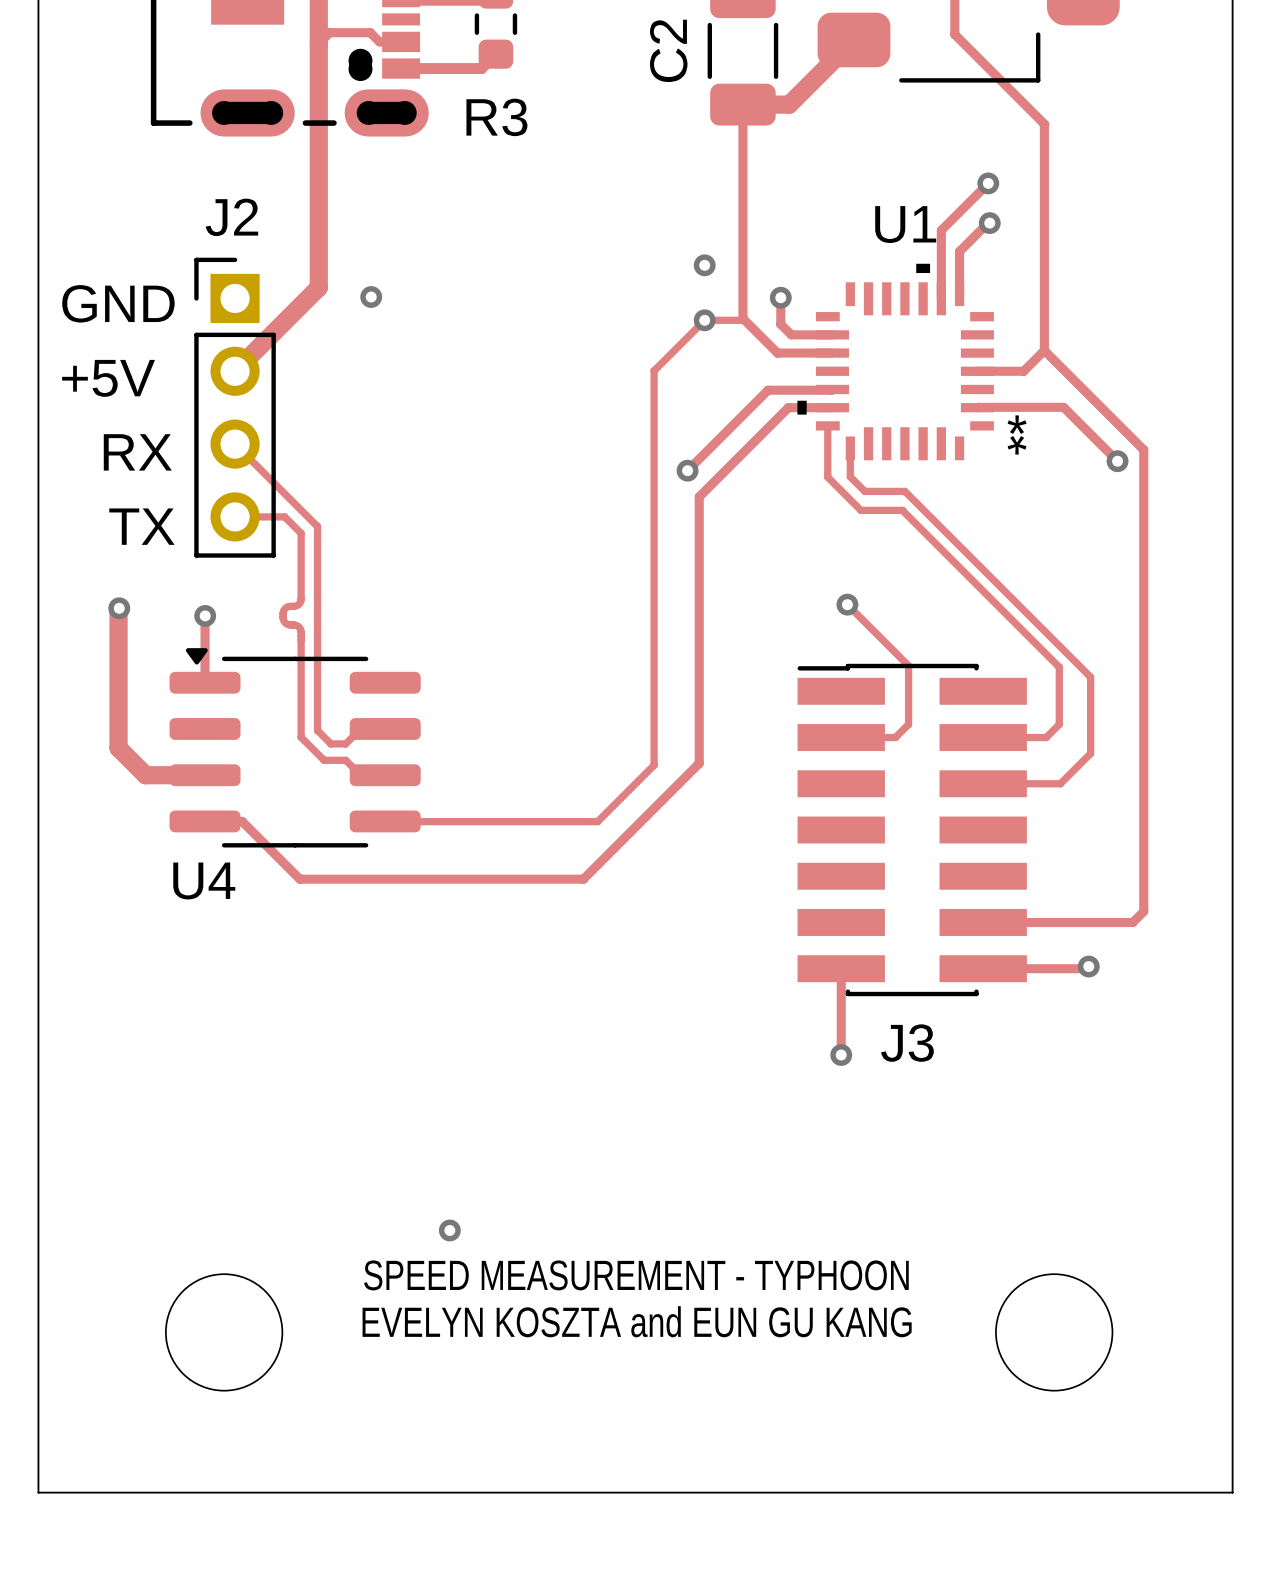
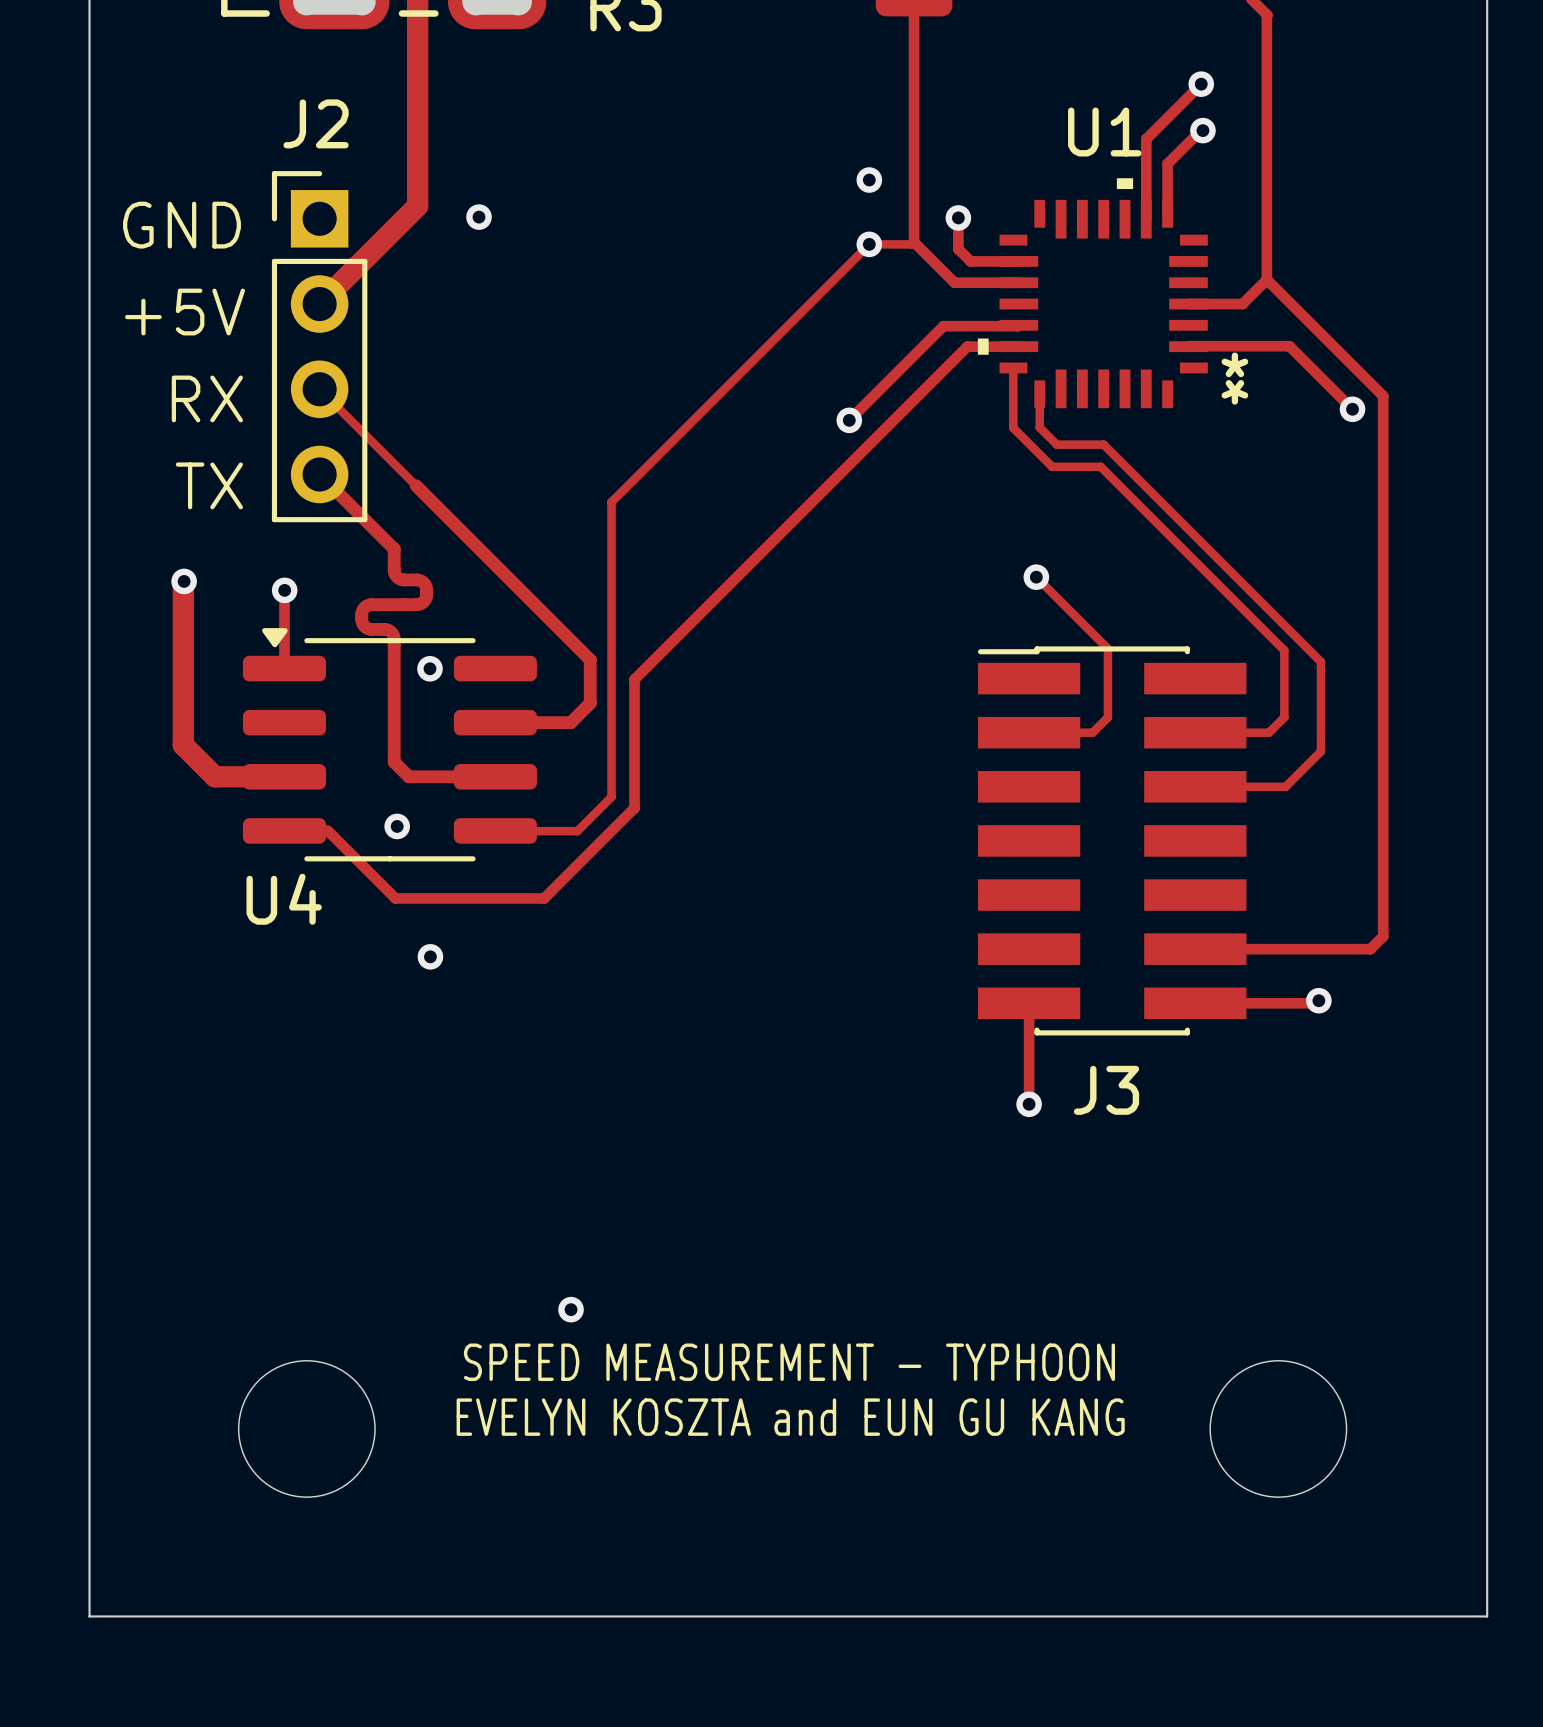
track: (654, 370) (654, 765) (597, 821) (455, 821) -> (810, 303) (611, 502) (611, 797) (577, 831)
track: (699, 496) (699, 763) (583, 879) (426, 879) -> (862, 451) (634, 679) (634, 808) (544, 898)
track: (235, 516) (284, 516) (301, 533) (300, 600) (296, 605) (285, 607) (283, 613) (285, 622) (297, 626) (301, 631) (301, 737) (324, 760) (345, 760) (360, 775) -> (319, 474) (394, 549) (394, 571) (397, 577) (402, 579) (419, 580) (426, 587) (426, 598) (419, 604) (370, 604) (365, 606) (362, 612) (362, 621) (365, 627) (387, 629) (393, 637) (394, 762) (408, 776) (466, 776)
track: (317, 526) (317, 730) (330, 743) (345, 743) (360, 728) (385, 728) -> (416, 485) (590, 659) (590, 703) (570, 722) (495, 722)
via: none -> (429, 668)
via: none -> (397, 826)
via: none -> (430, 956)

